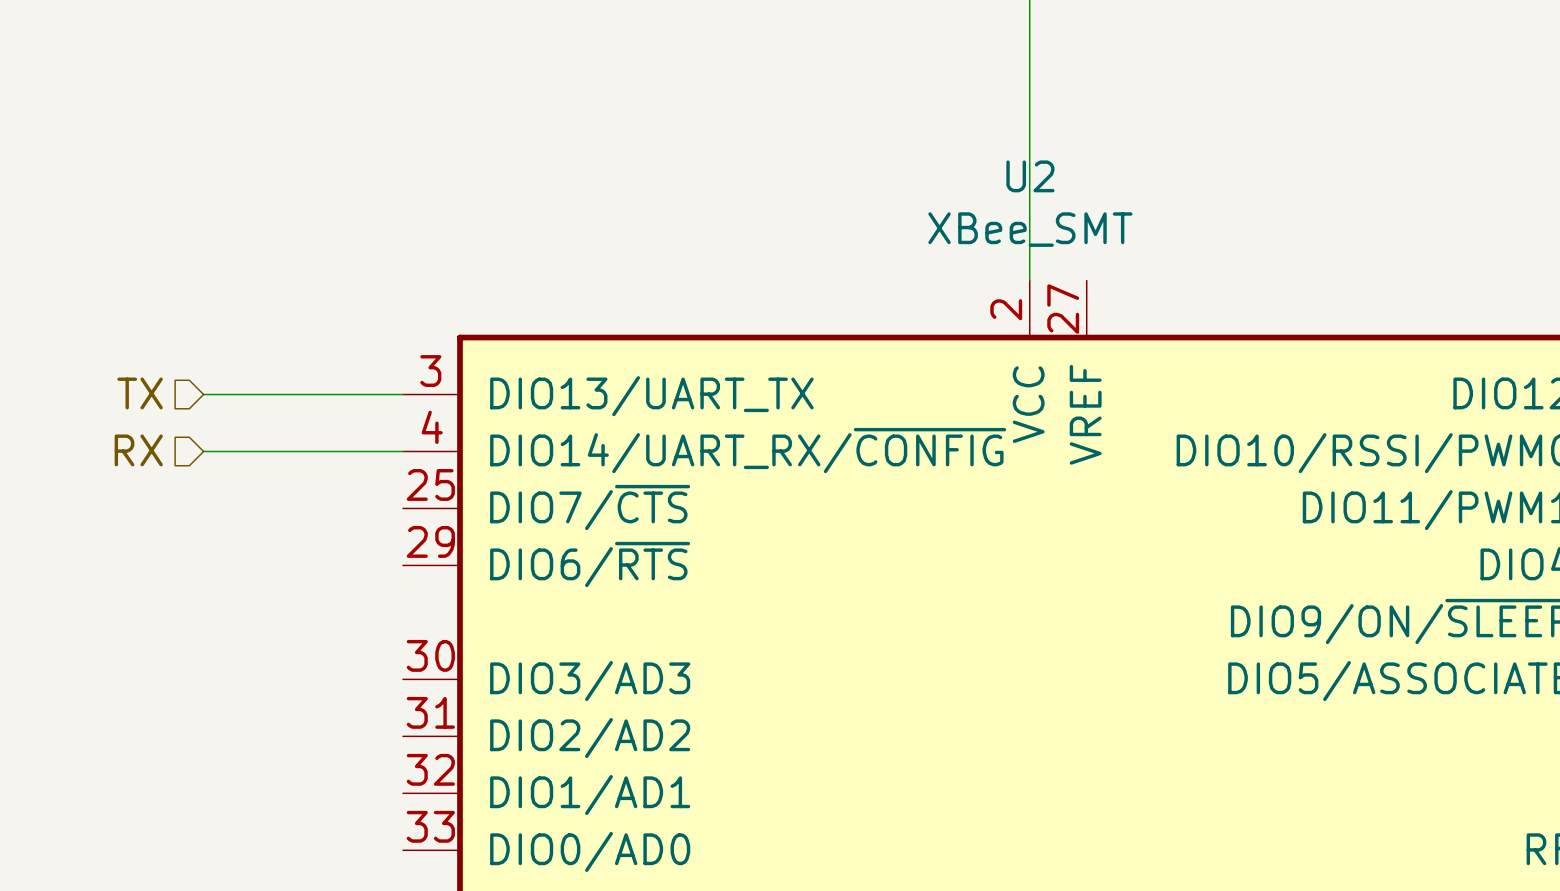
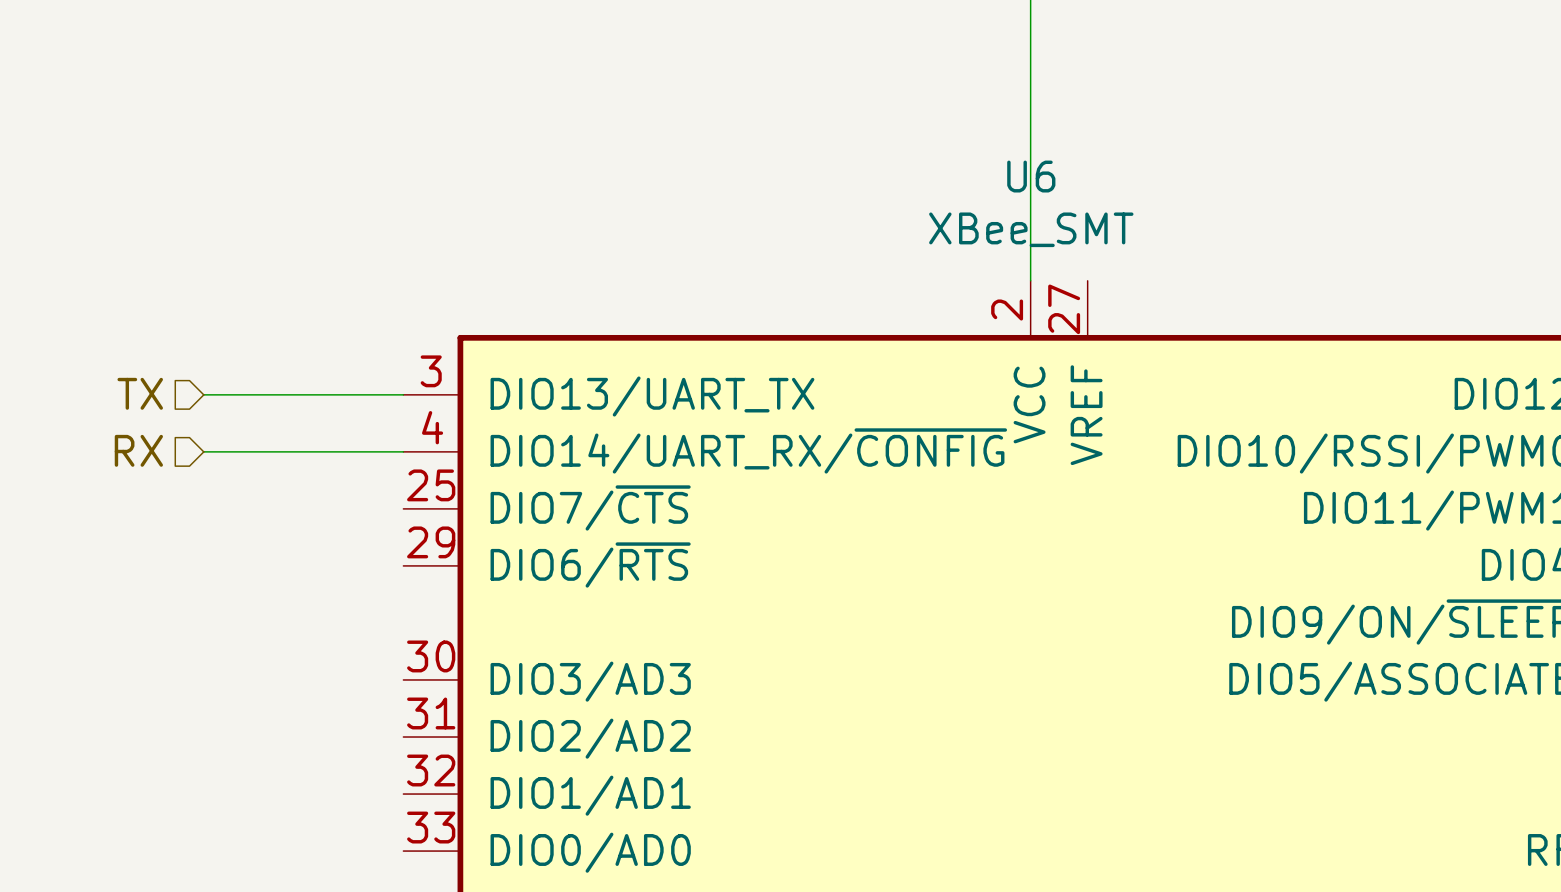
U2 name: U2 (1030, 176) -> U6 (1031, 176)

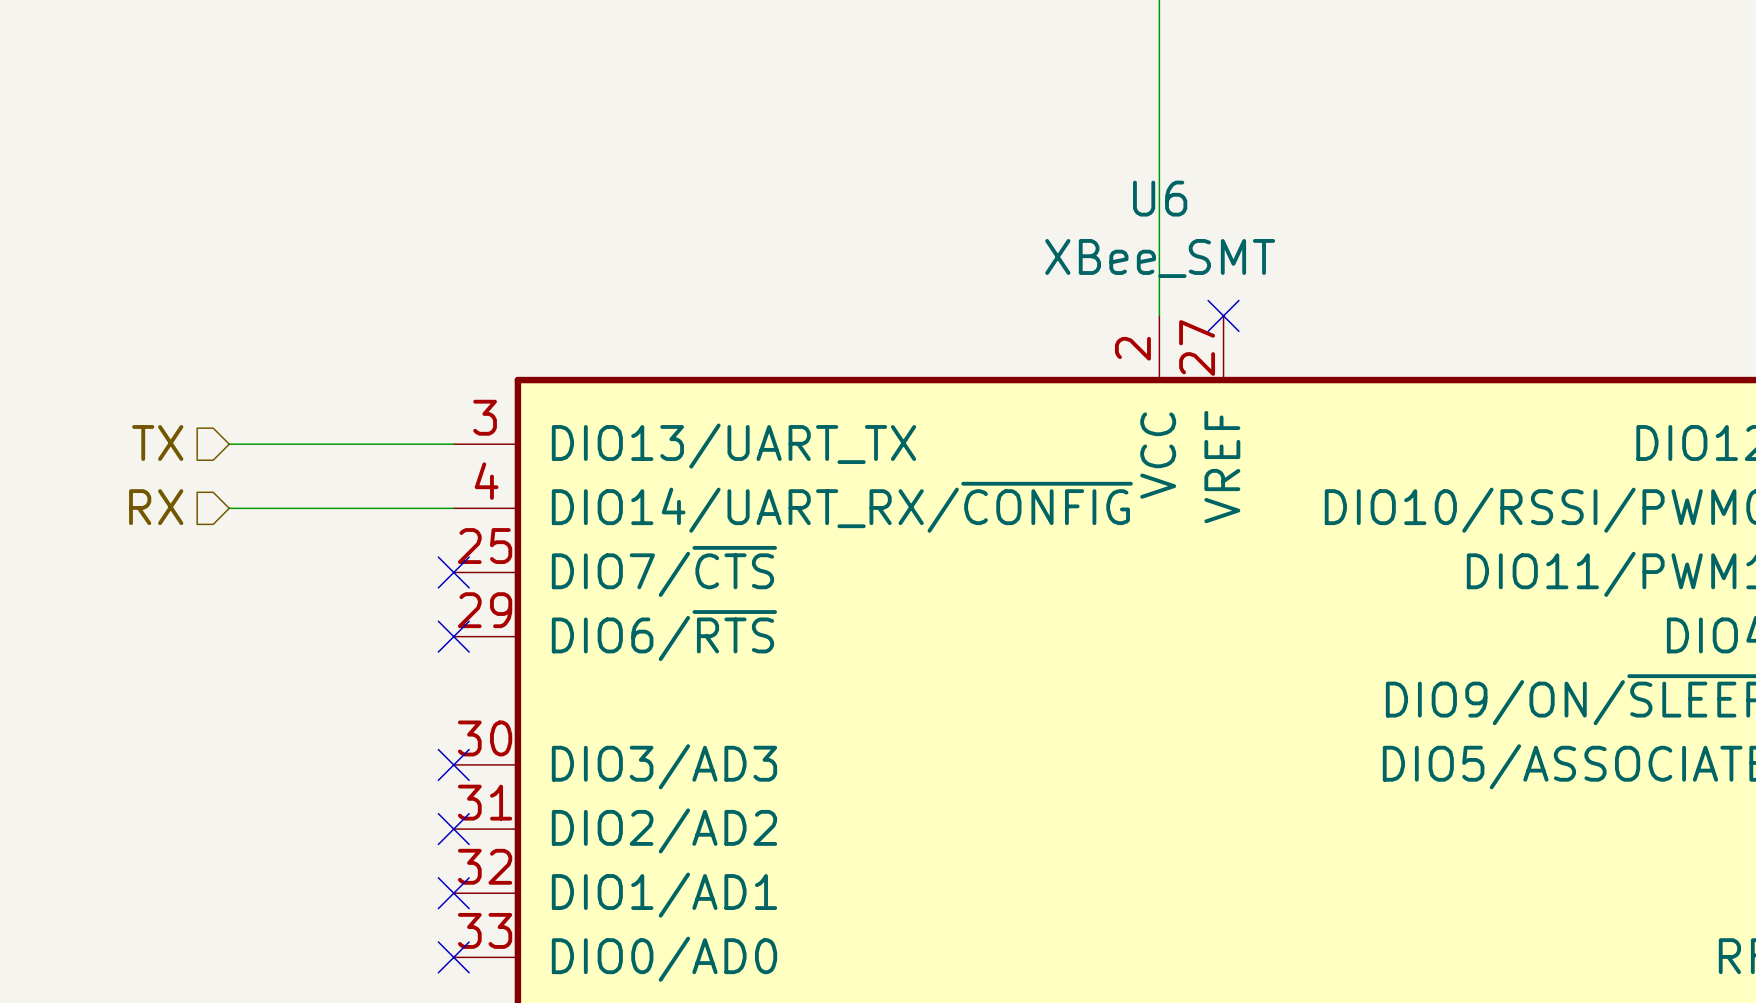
no-connect mark: none -> (1223, 315)
no-connect mark: none -> (453, 572)
no-connect mark: none -> (453, 636)
no-connect mark: none -> (453, 764)
no-connect mark: none -> (453, 829)
no-connect mark: none -> (453, 893)
no-connect mark: none -> (453, 957)

